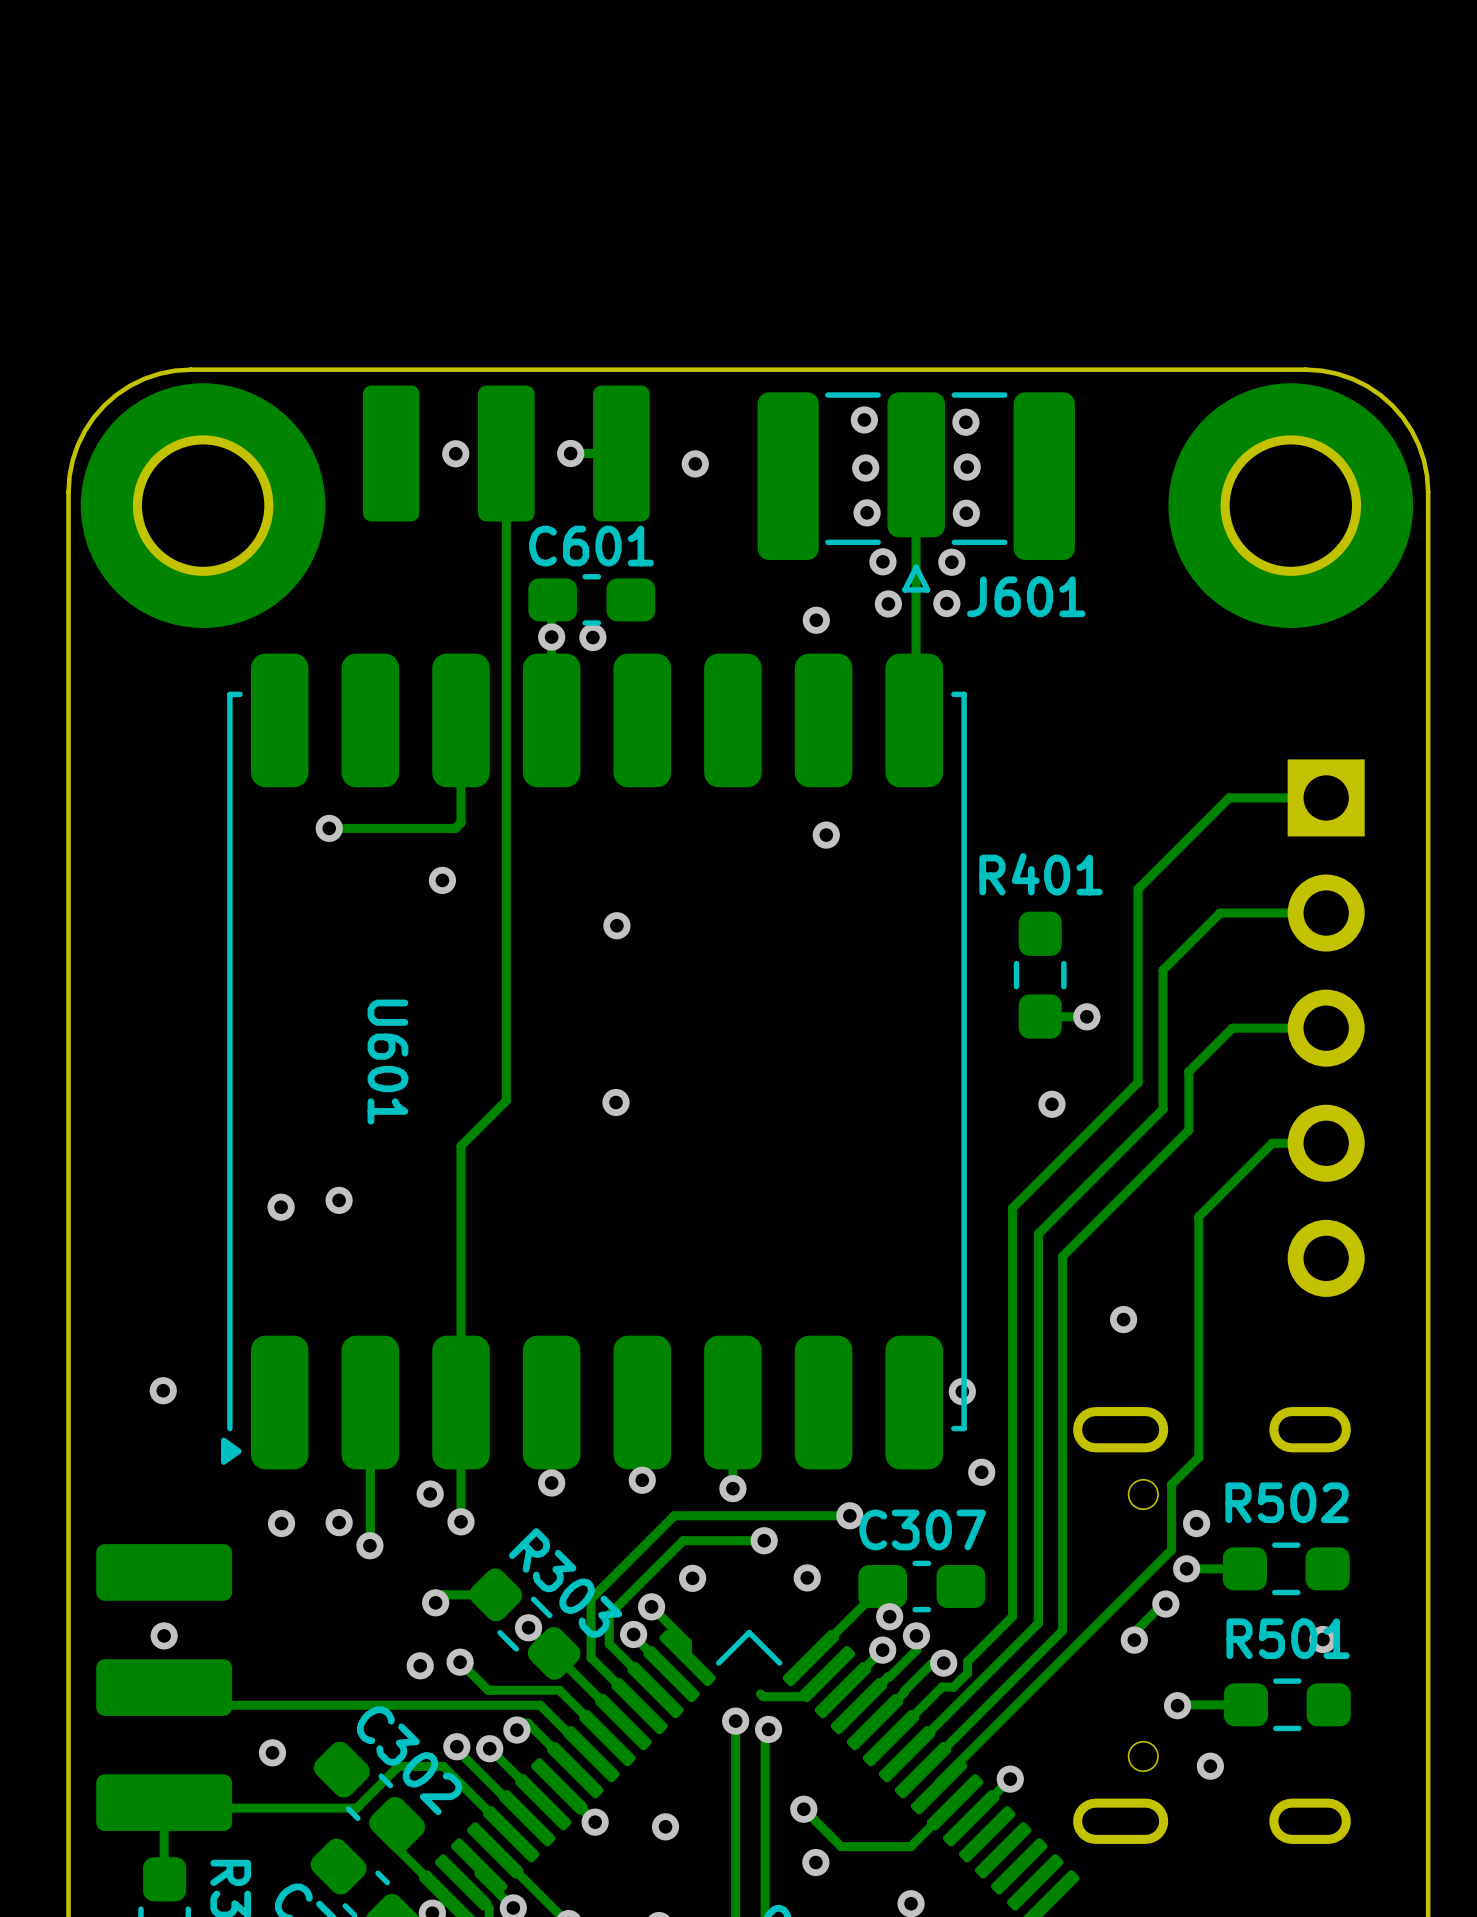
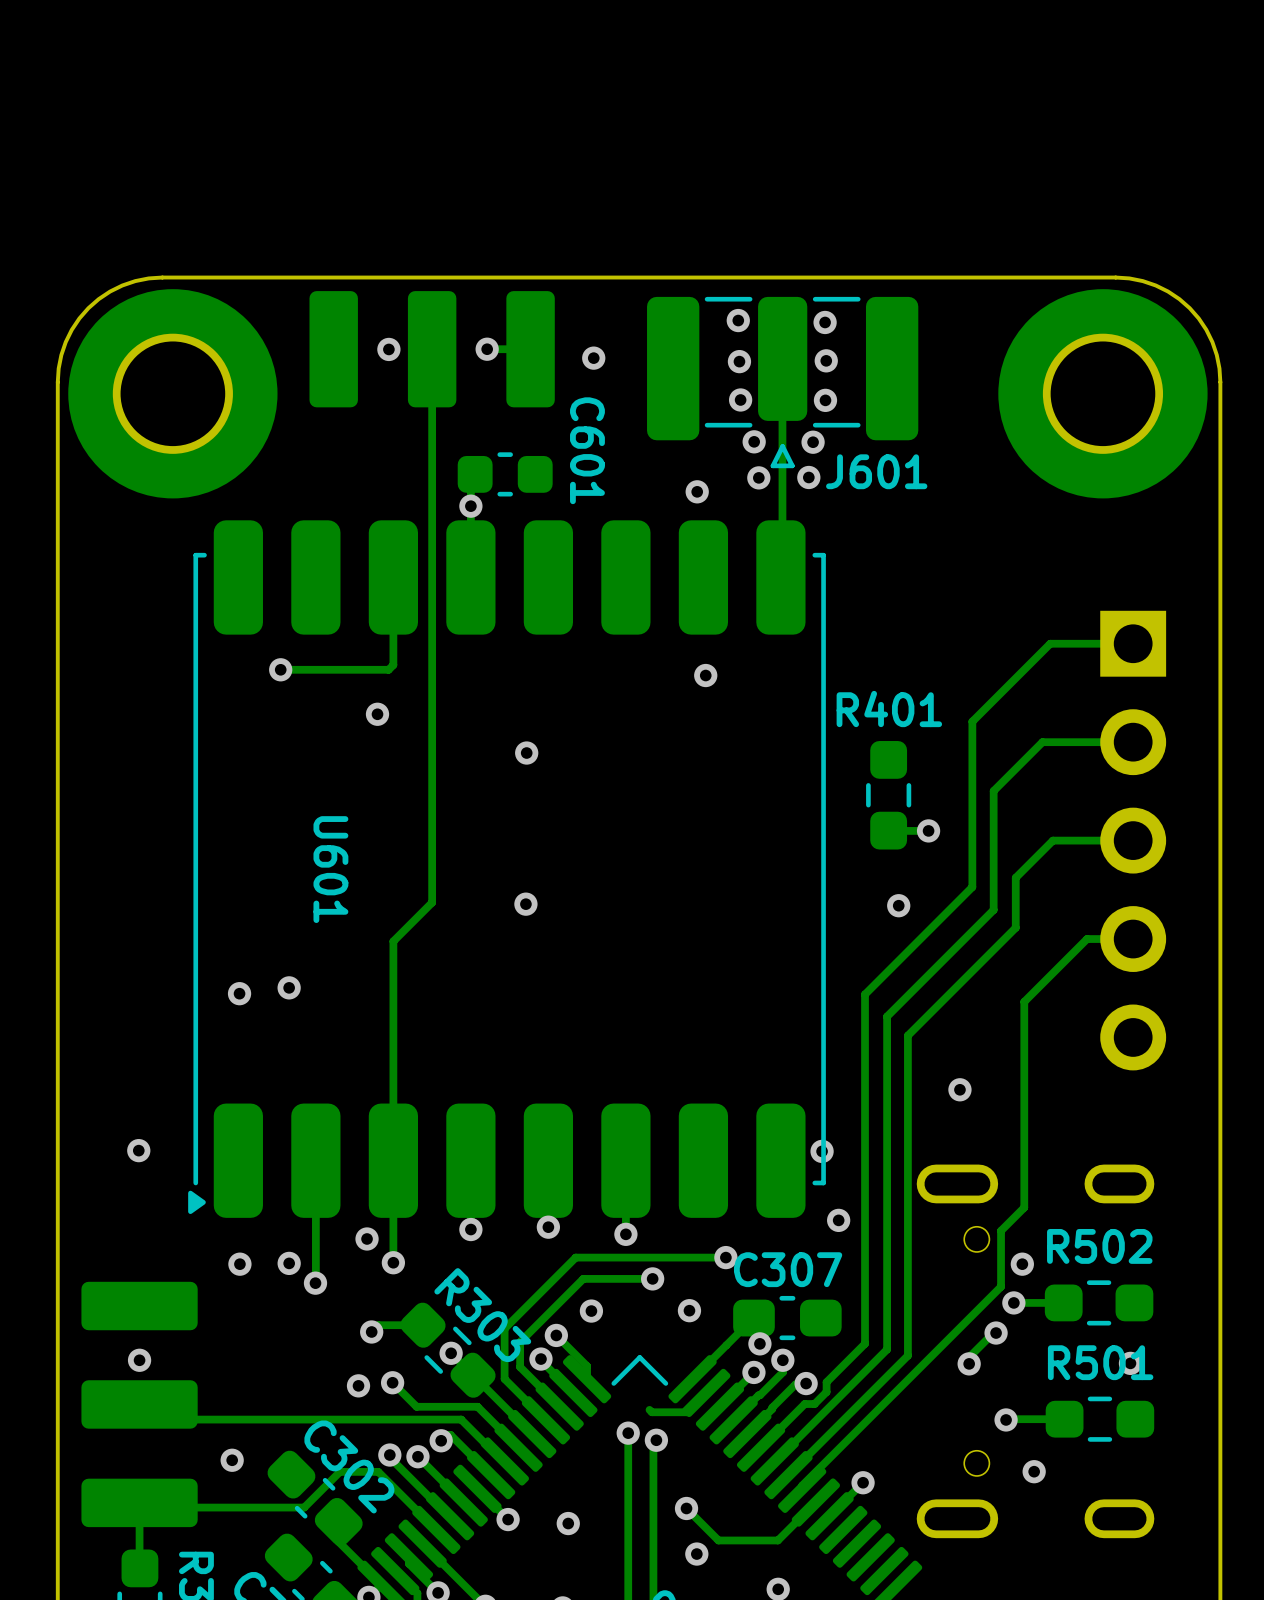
C601 name rotation: 0° (591, 546) -> 90° clockwise (587, 450)
C601 footprint: [528, 574, 656, 626] -> [457, 452, 553, 497]
via: (592, 637) -> none

